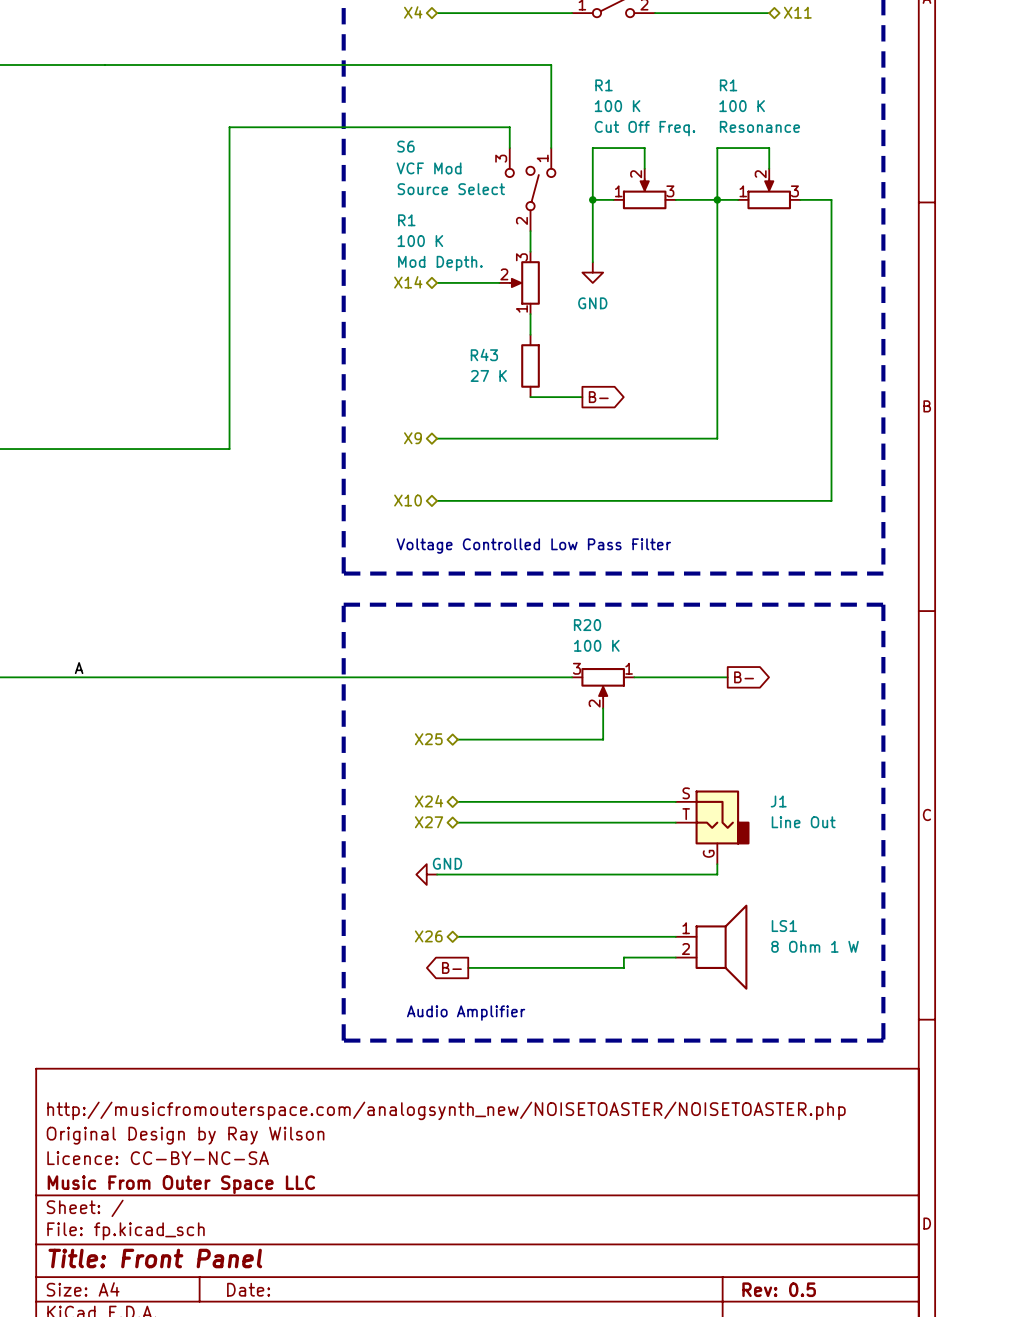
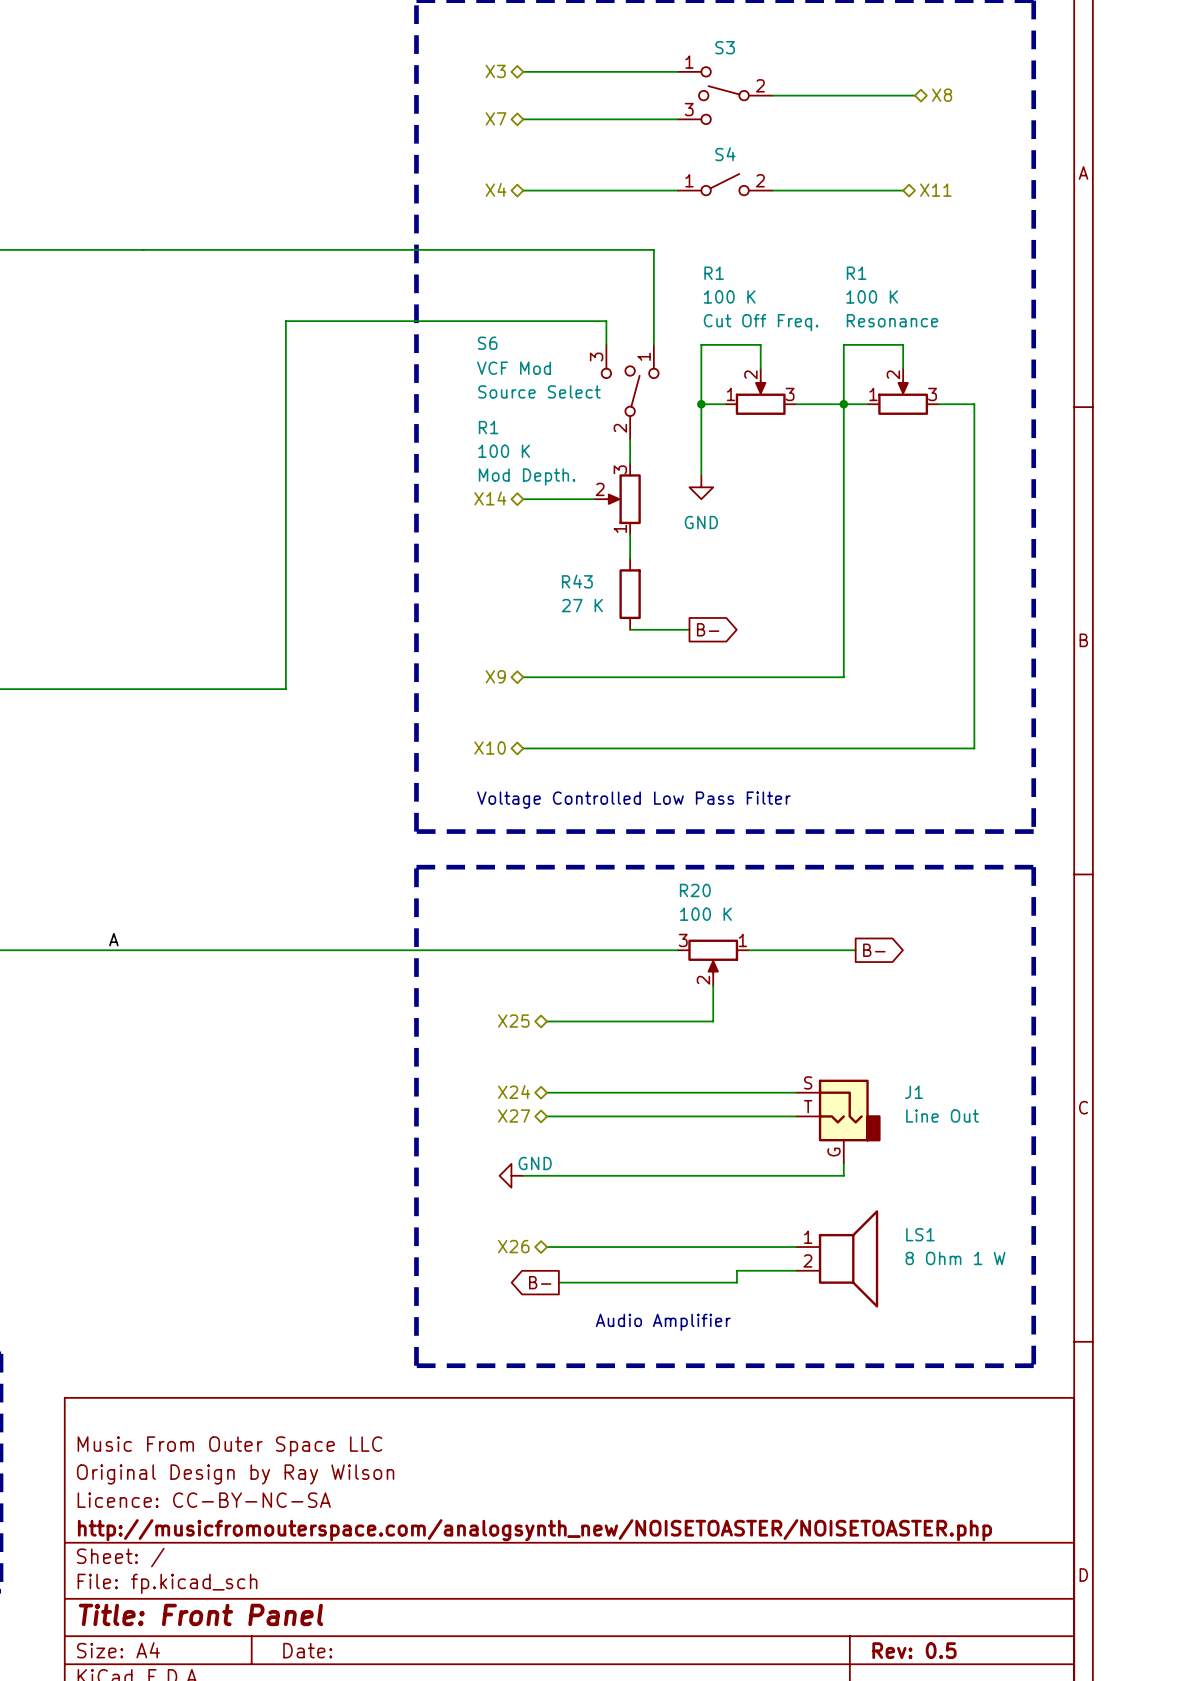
text position: Audio Amplifier (466, 1013) -> Audio Amplifier (663, 1322)
title block: http://musicfromouterspace.com/analogsynth_new/NOISETOASTER/NOISETOASTER.php (446, 1110) -> Music From Outer Space LLC (229, 1446)
title block: Music From Outer Space LLC (181, 1184) -> http://musicfromouterspace.com/analogsynth_new/NOISETOASTER/NOISETOASTER.php (534, 1530)

